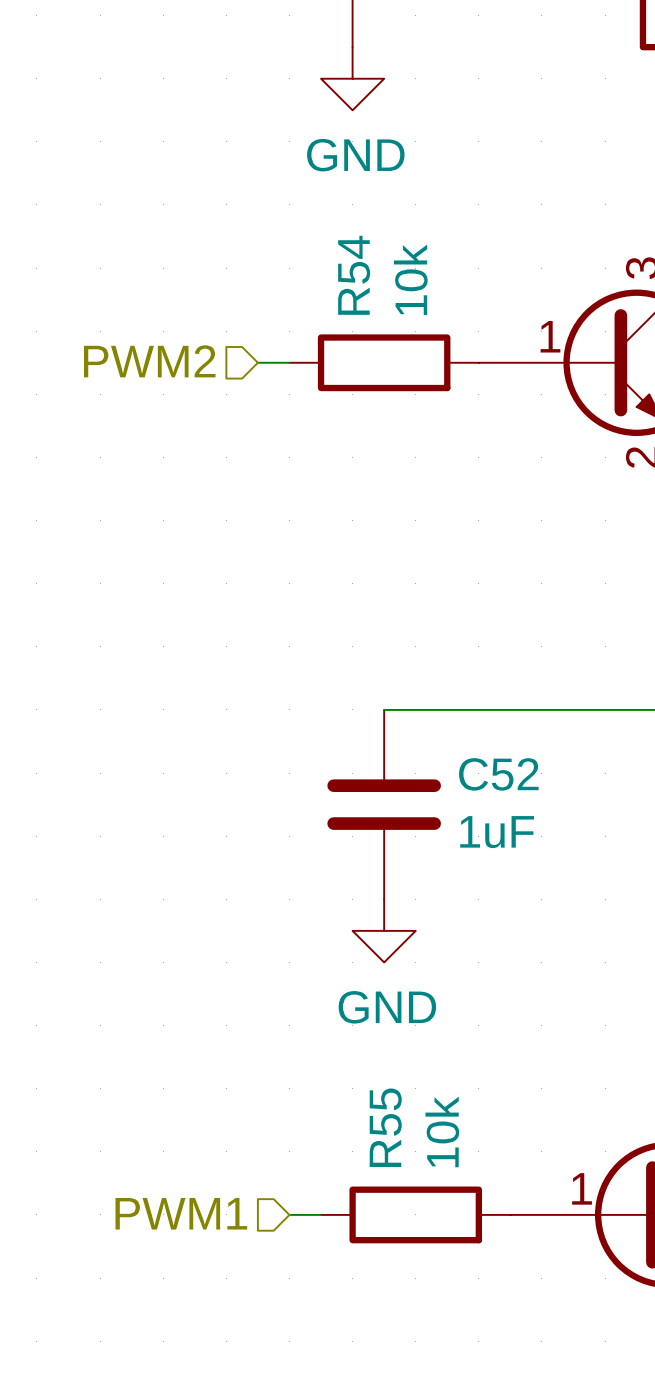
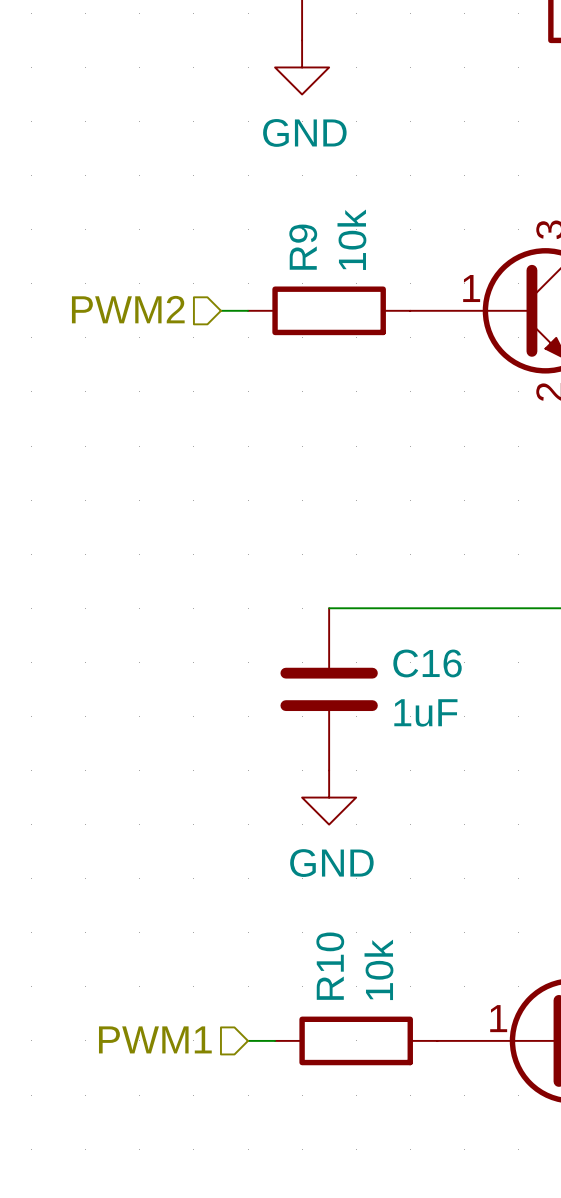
R54 name: R54 (354, 275) -> R9 (303, 247)
C52 name: C52 (498, 774) -> C16 (427, 663)
R55 name: R55 (385, 1127) -> R10 (330, 966)

